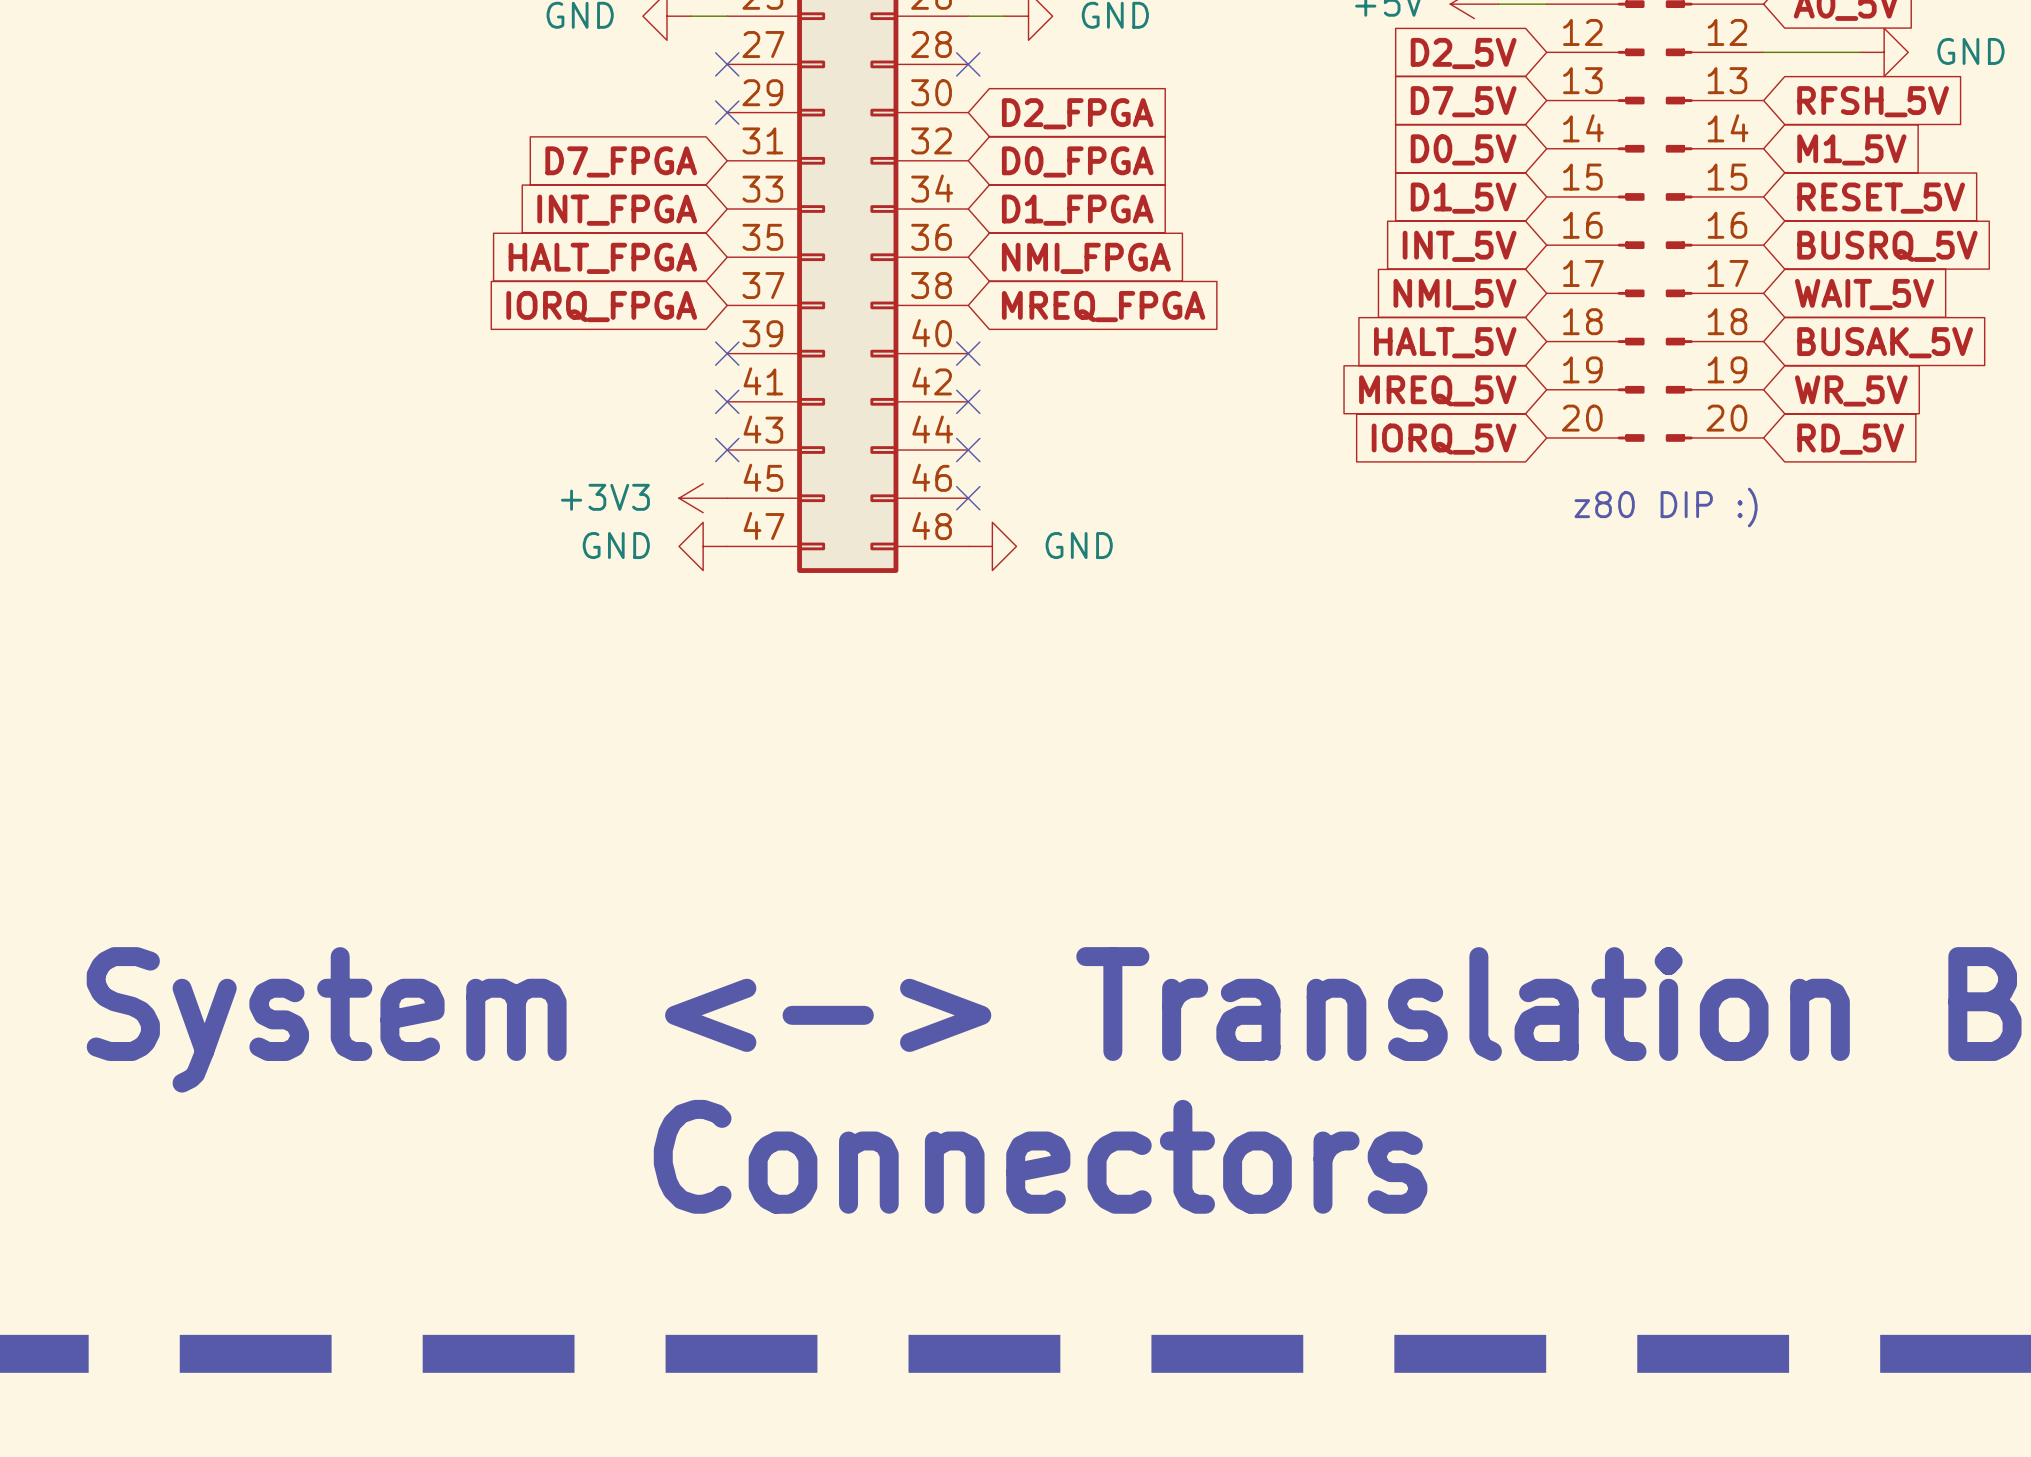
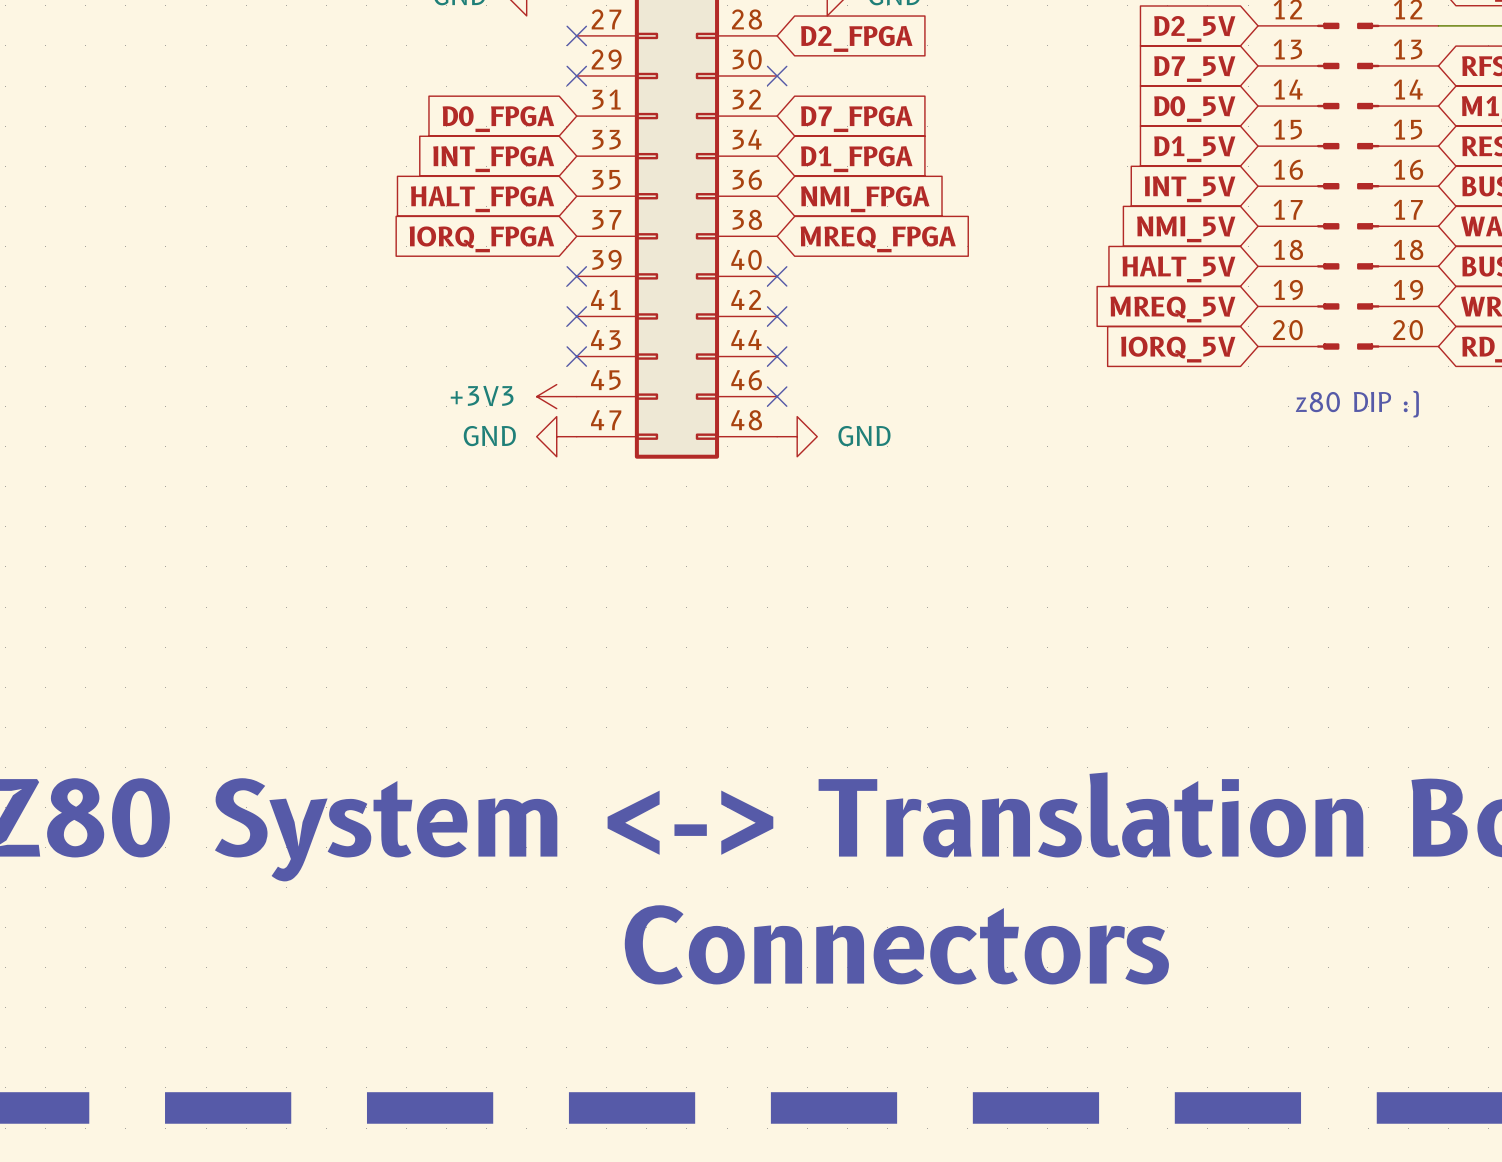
no-connect mark position: (968, 64) -> (777, 76)
global label position: D2_FPGA (1077, 113) -> D2_FPGA (856, 38)
global label: D7_FPGA (621, 161) -> D0_FPGA (498, 119)
global label: D0_FPGA (1077, 161) -> D7_FPGA (856, 119)
text position: Connectors (1040, 1156) -> Connectors (896, 944)

